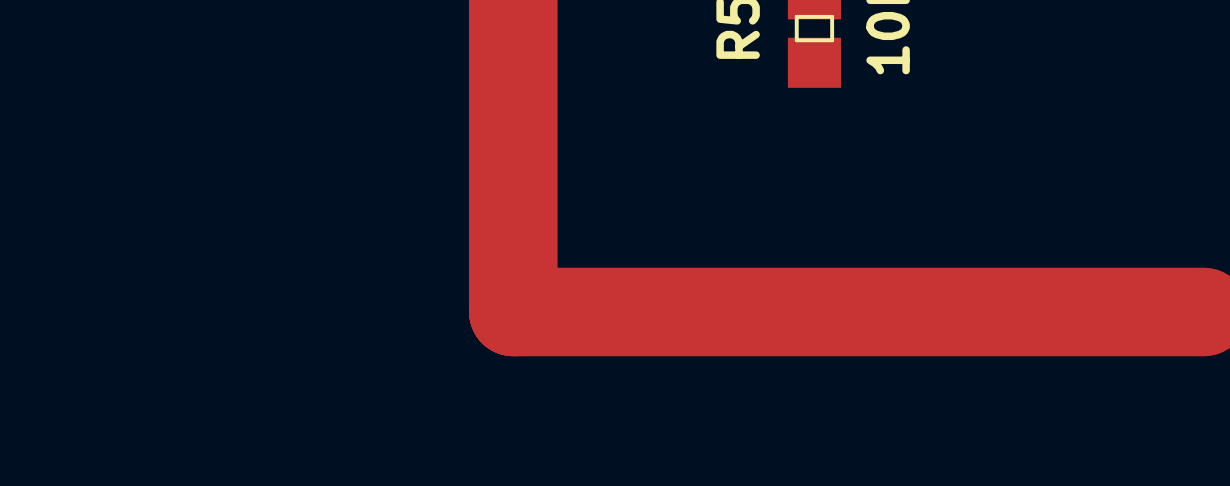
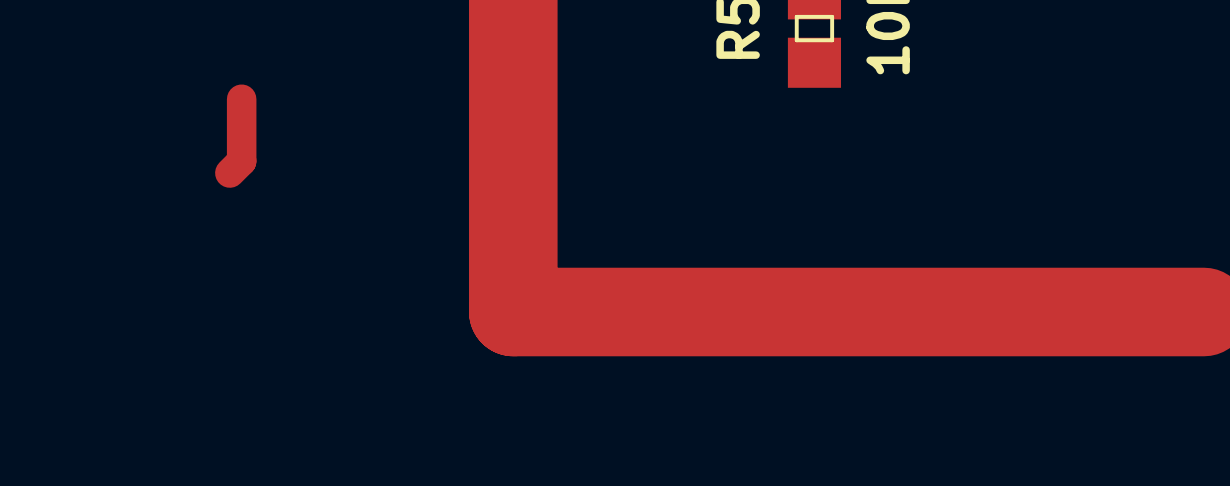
top track: none -> (241, 99) (241, 161) (229, 173)

